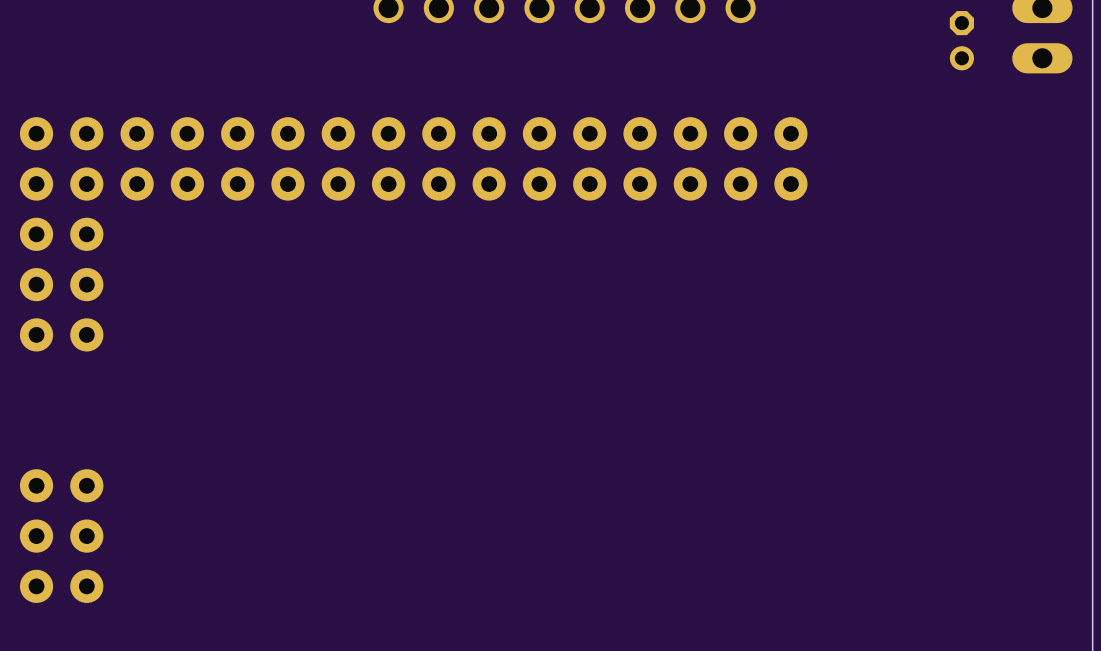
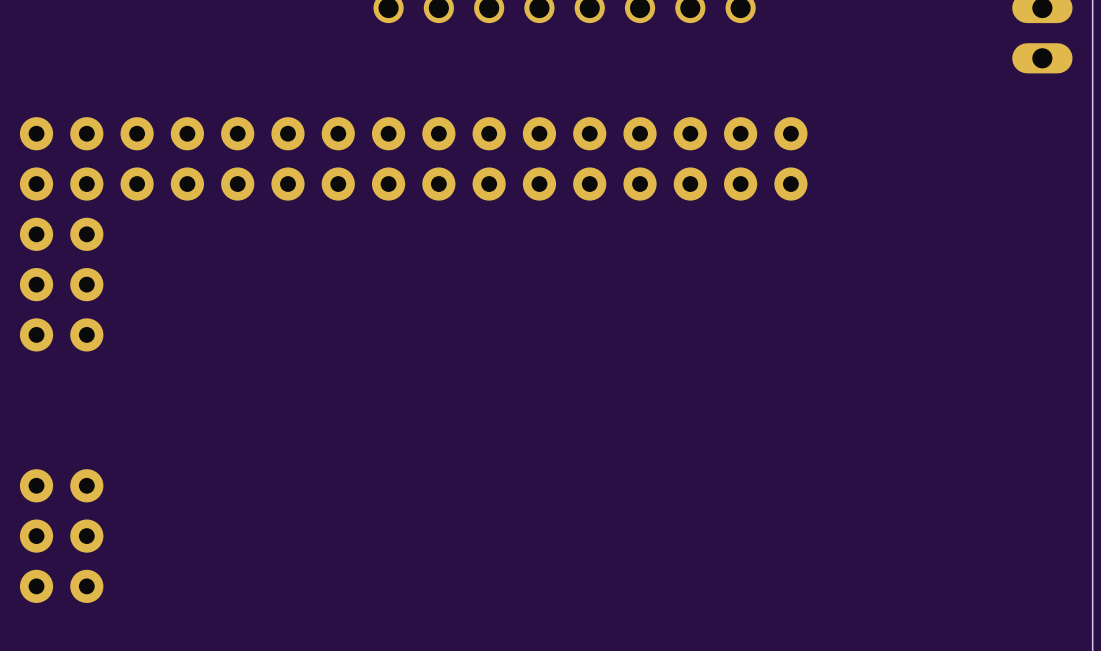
part: (961, 40) -> none

